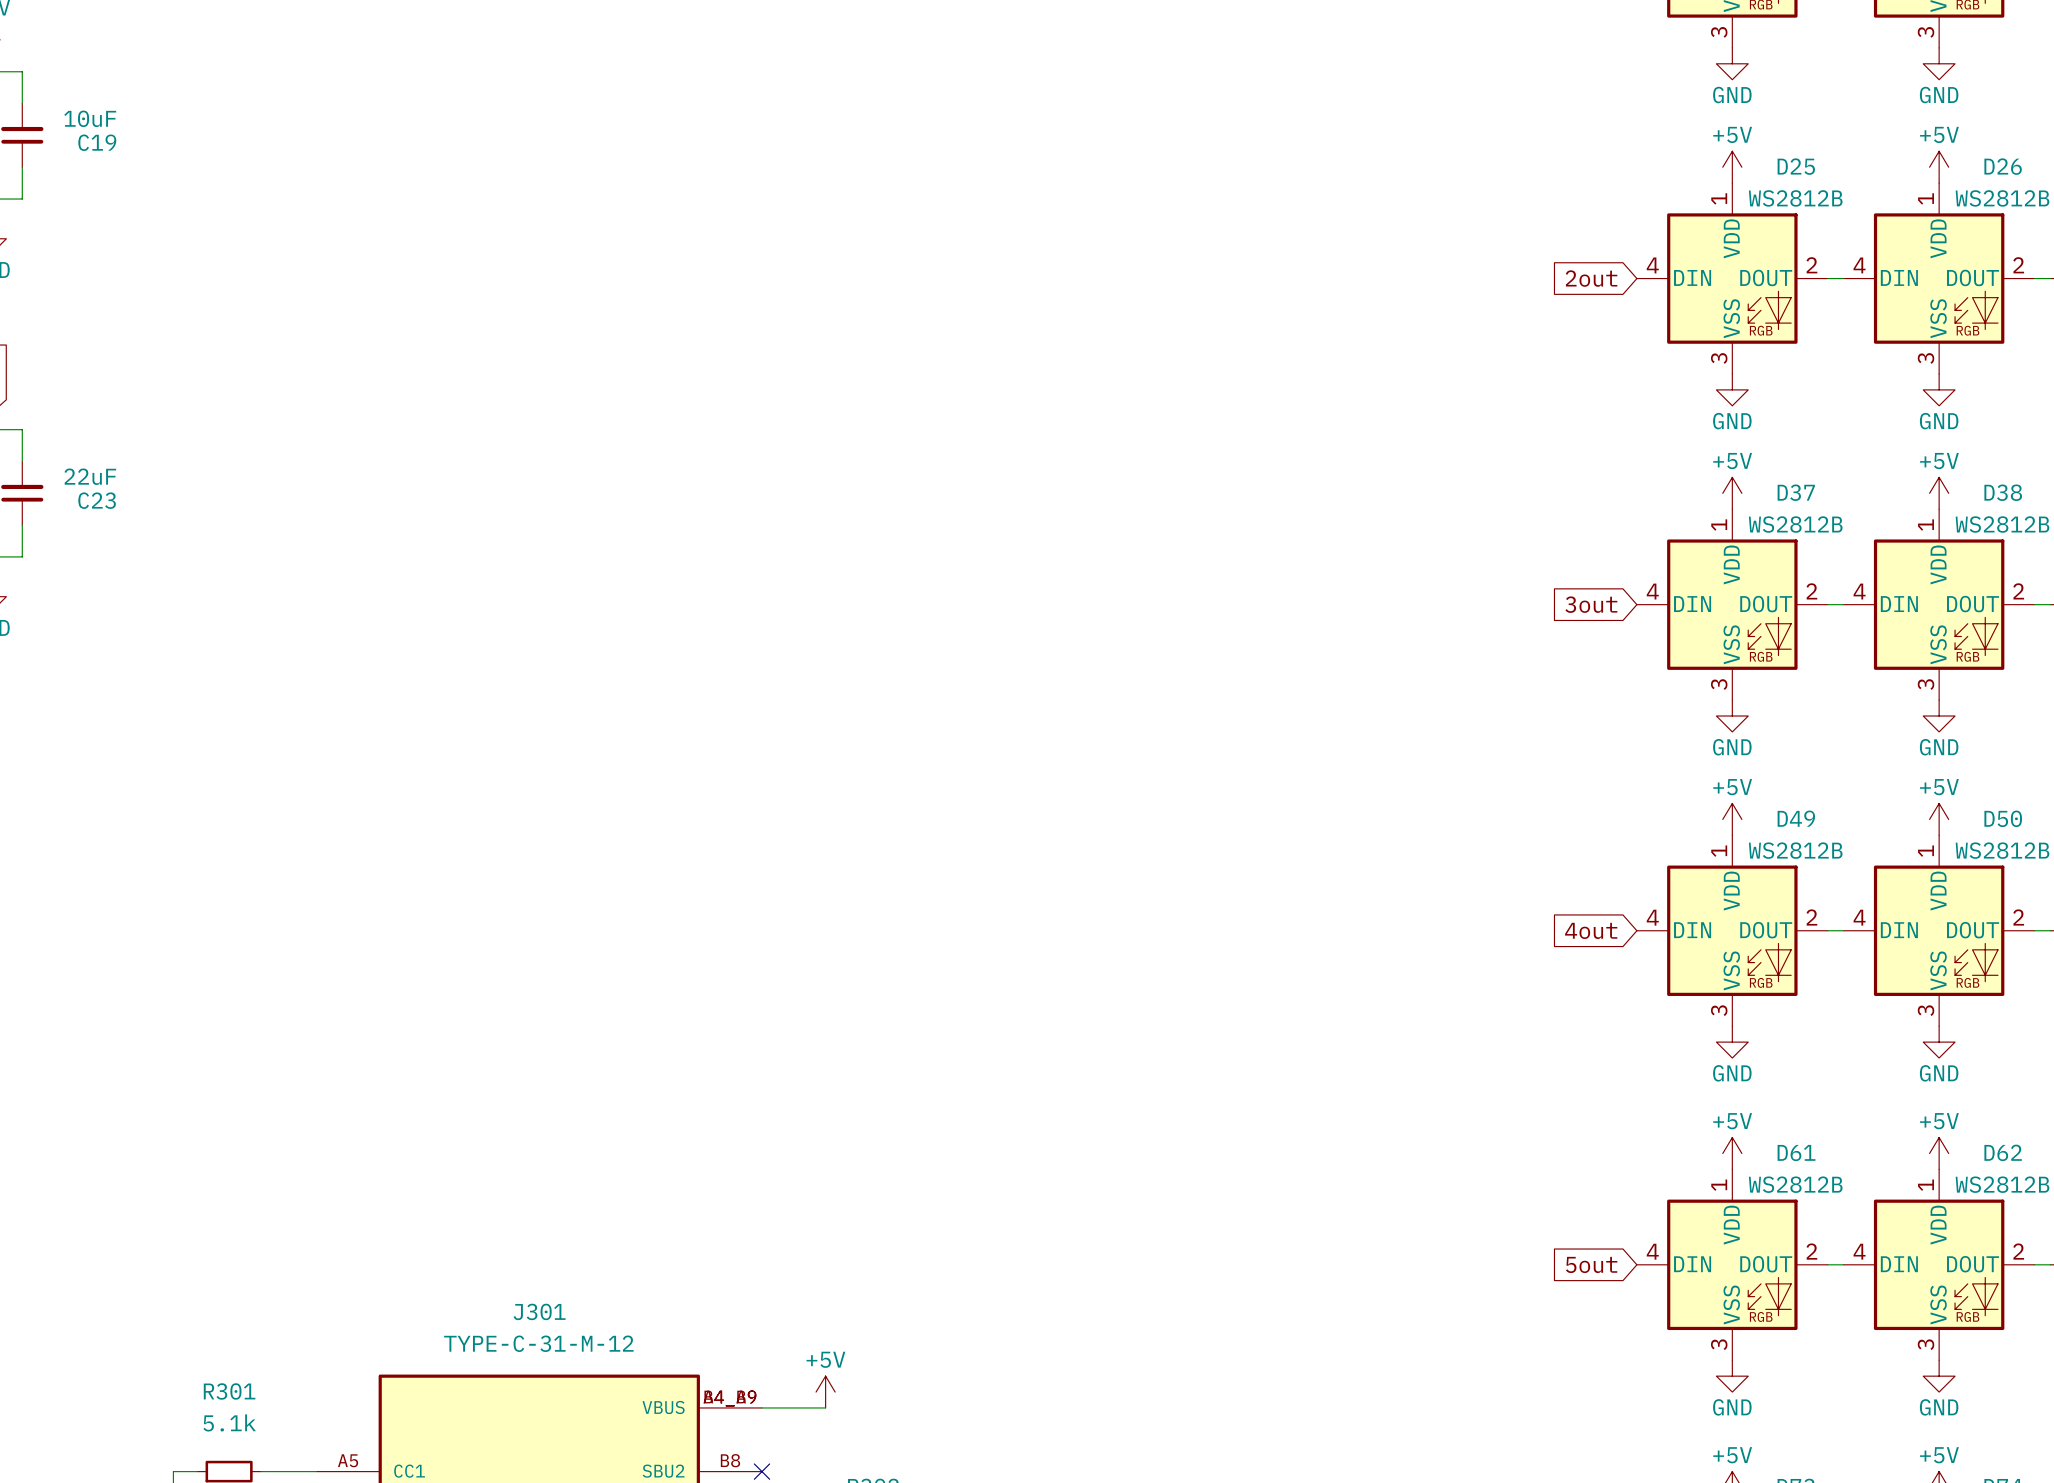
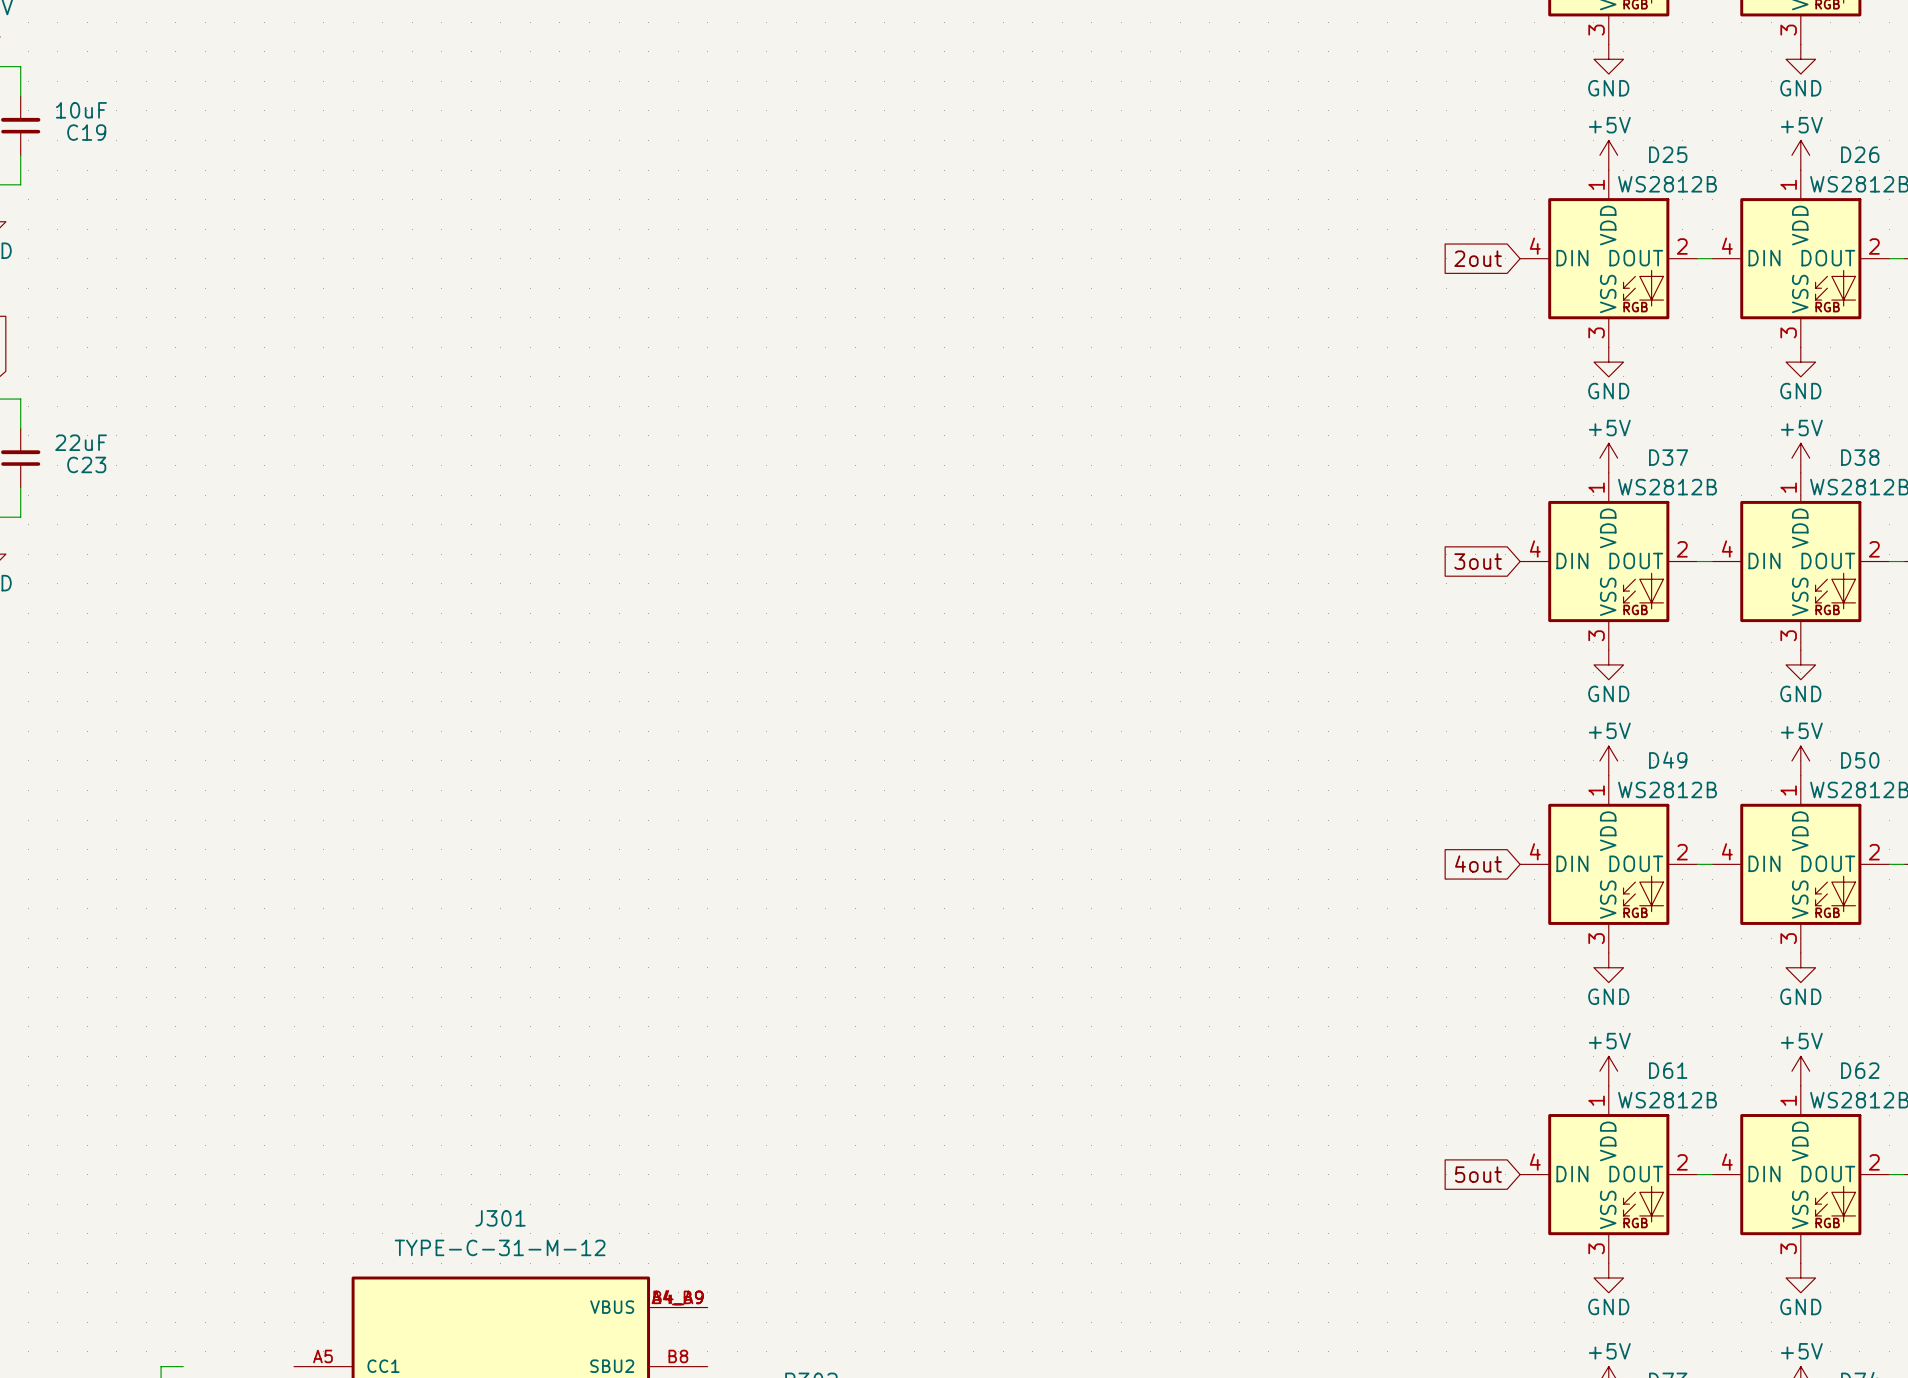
power symbol: +5V (825, 1392) -> none
wire: (761, 1407) (825, 1407) -> none
R301: 5.1k (229, 1471) -> none
wire: (260, 1471) (316, 1471) -> none
no-connect mark: (761, 1471) -> none

